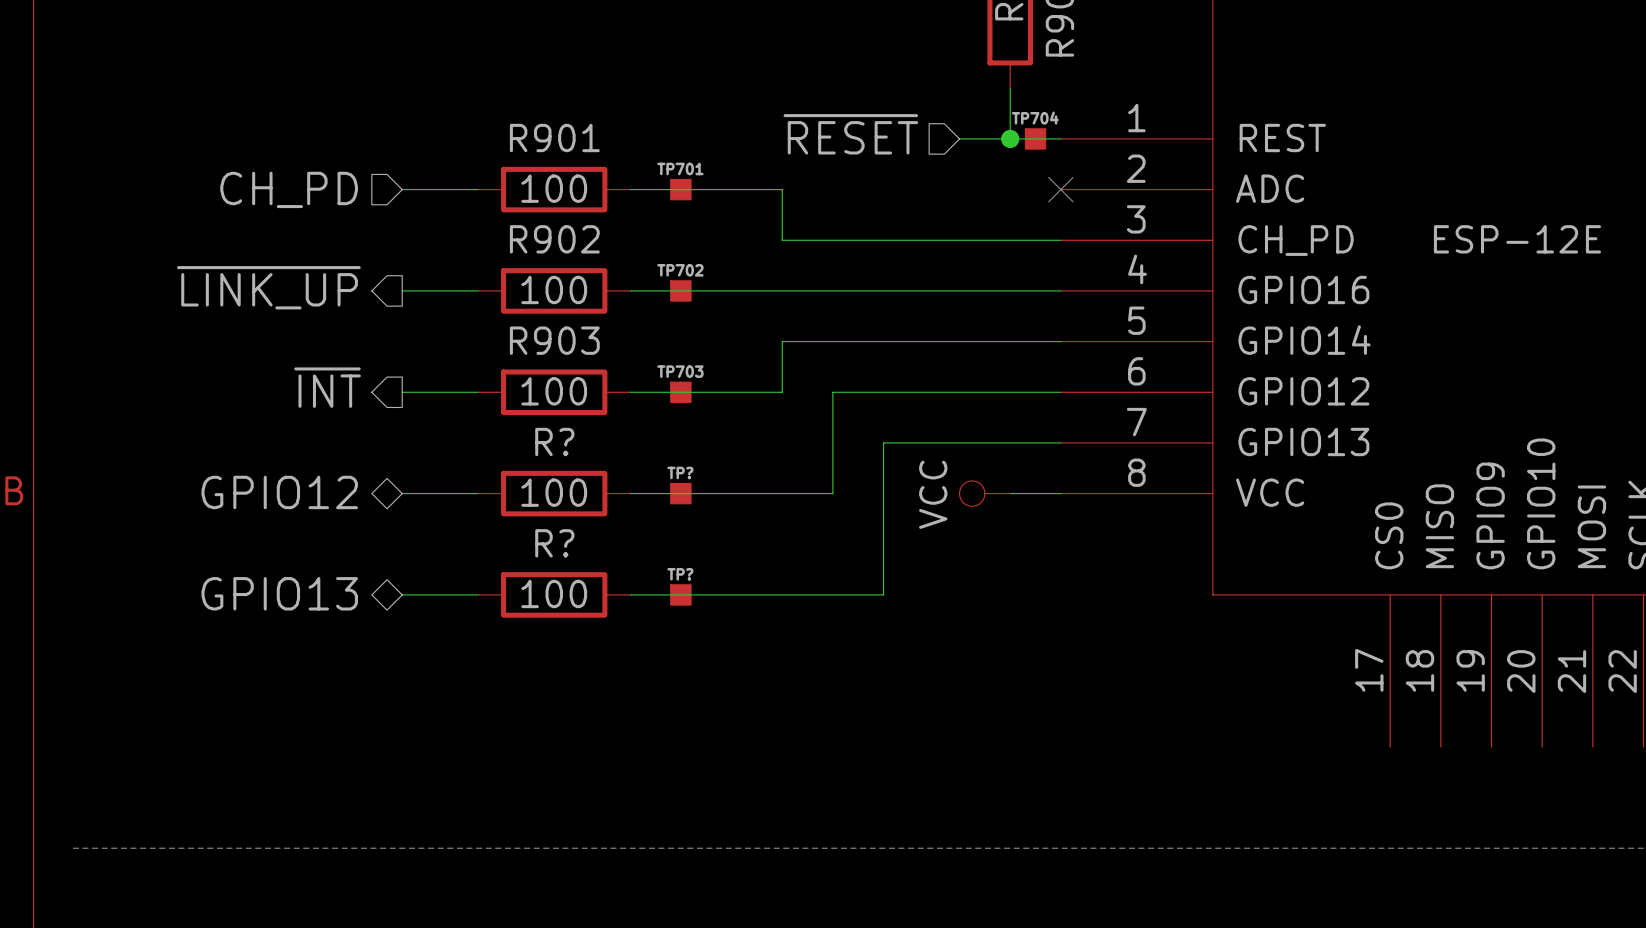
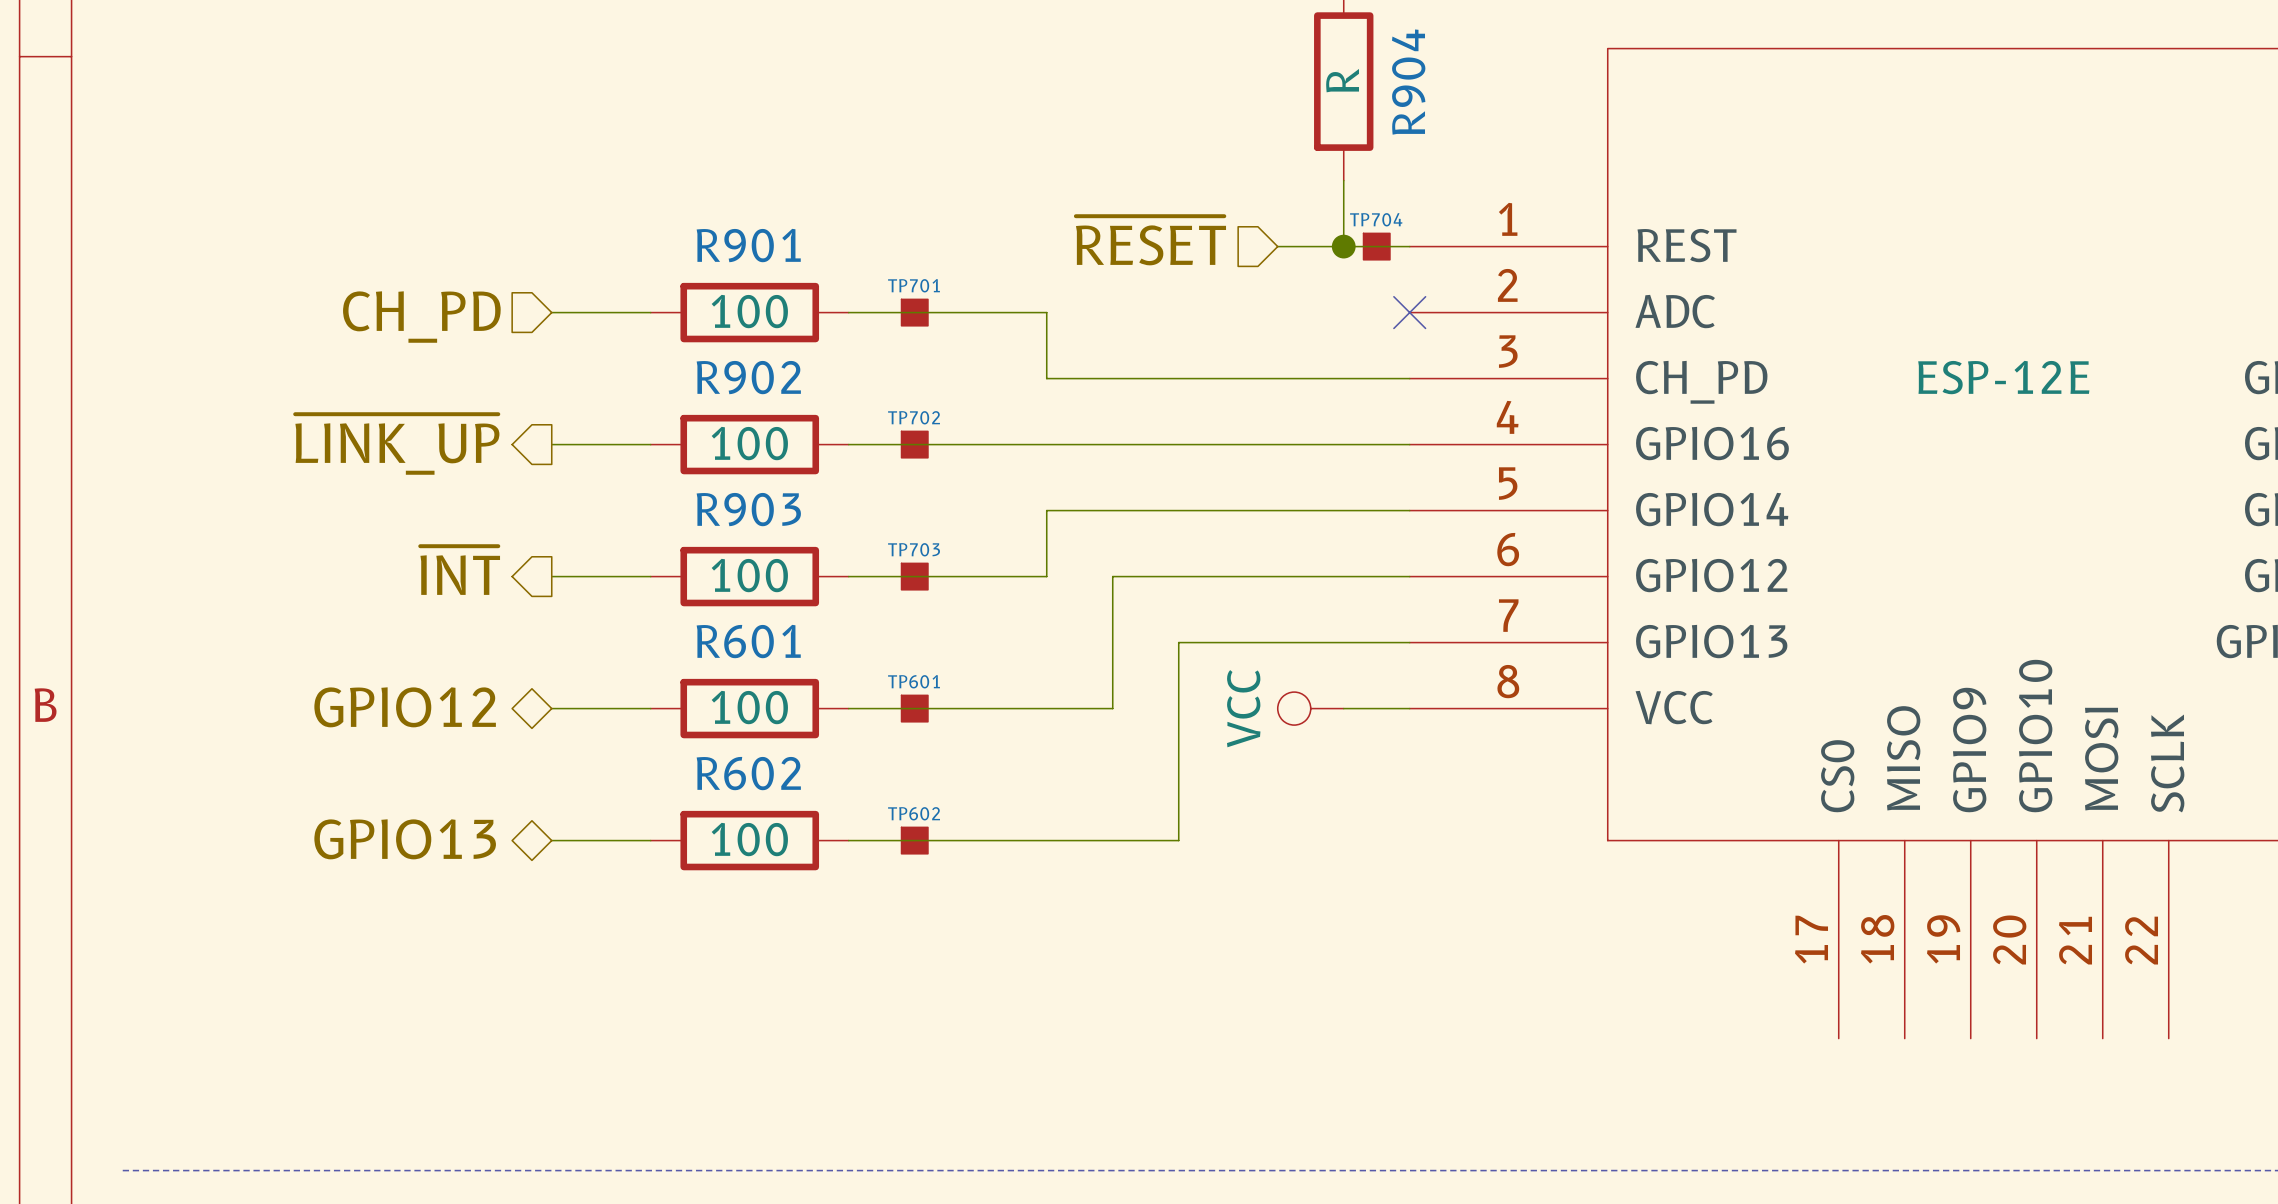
R? name: R? (554, 441) -> R601 (748, 641)
TP? name: TP? (680, 472) -> TP601 (914, 681)
R? name: R? (554, 543) -> R602 (748, 773)
TP? name: TP? (680, 574) -> TP602 (914, 813)

